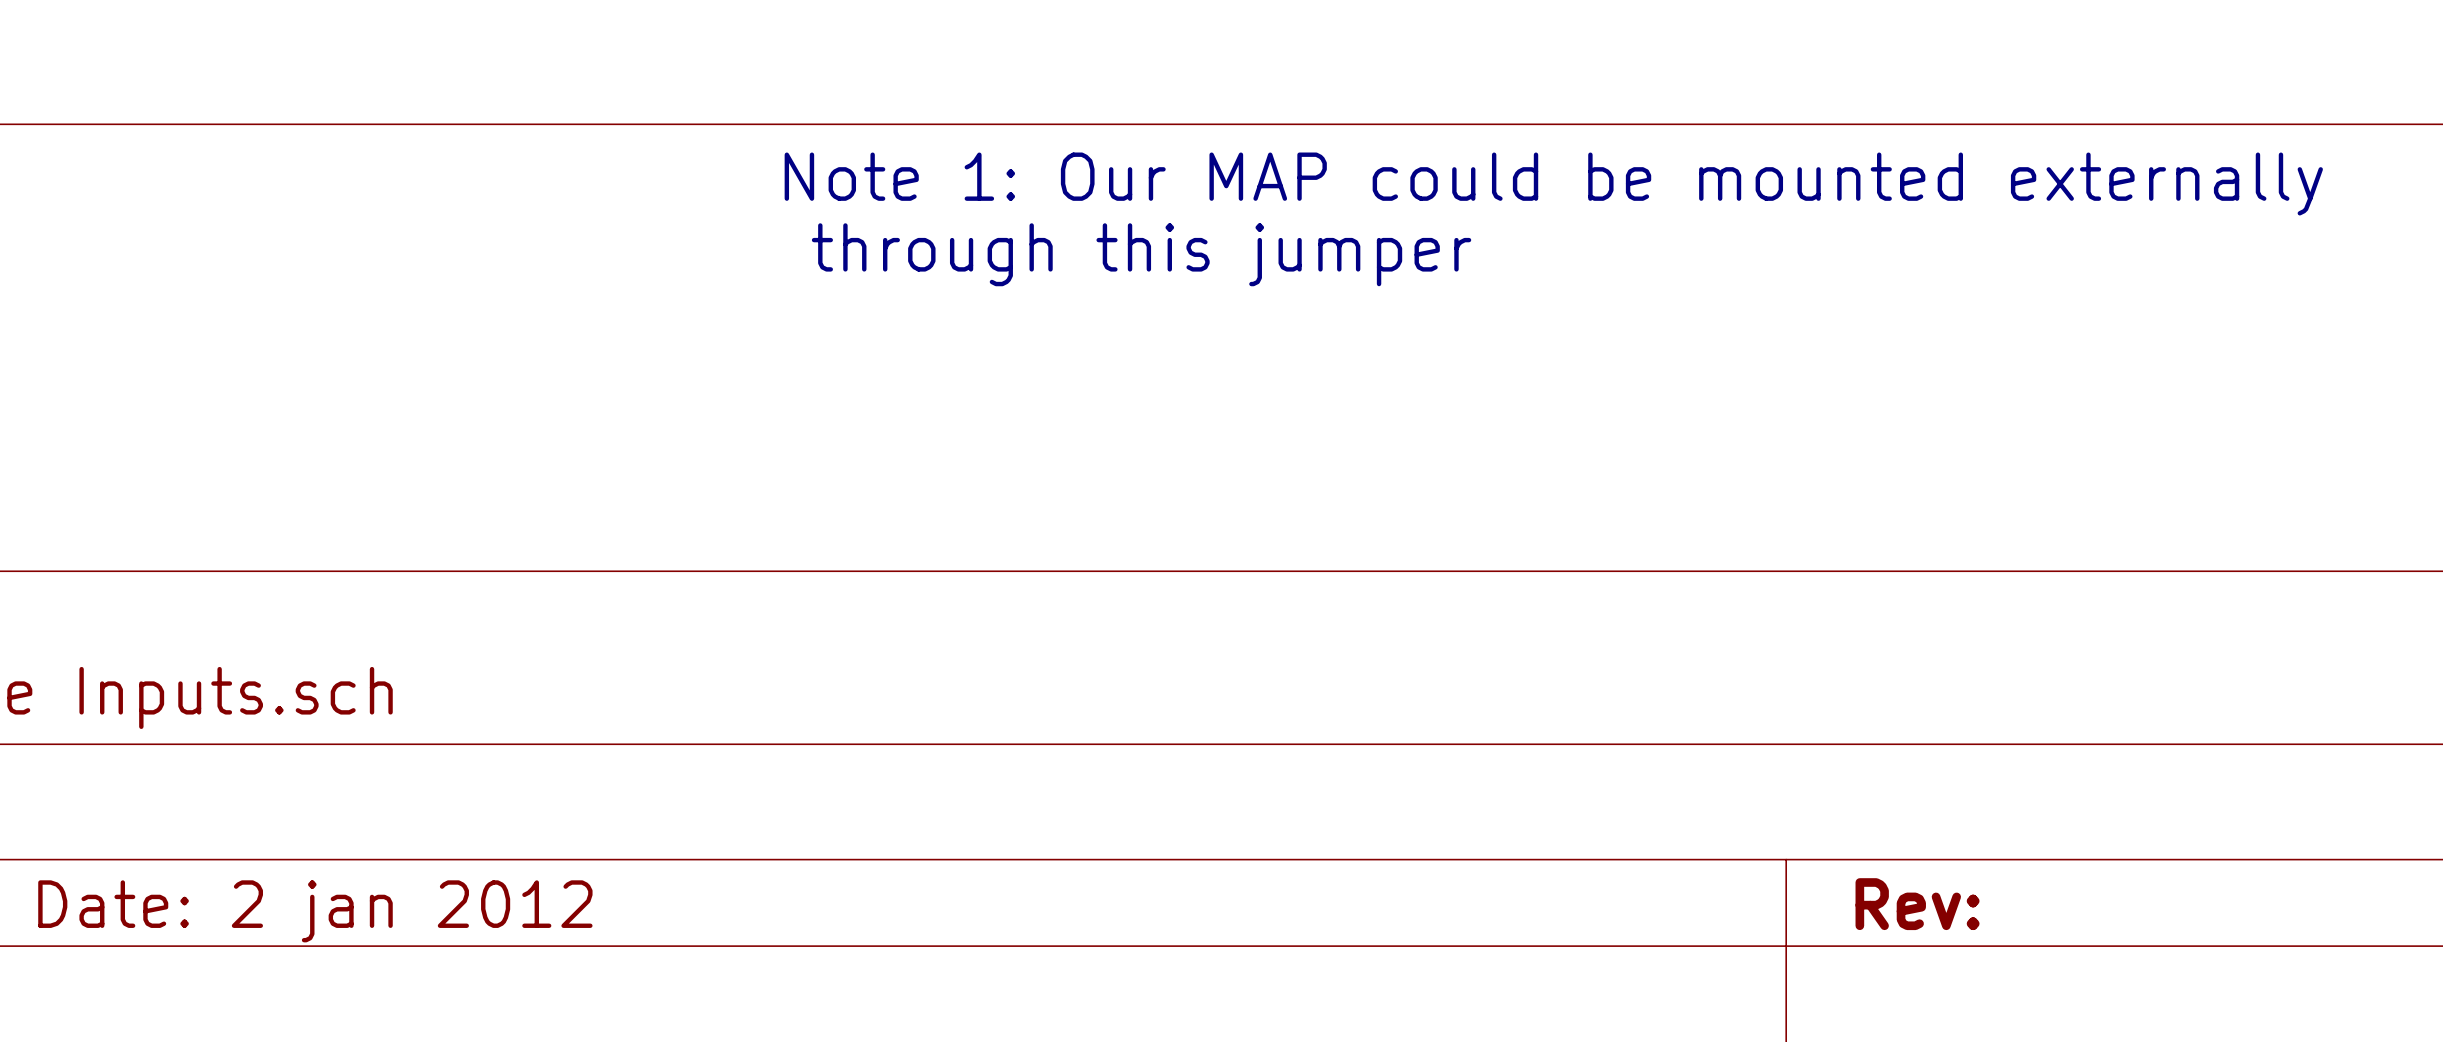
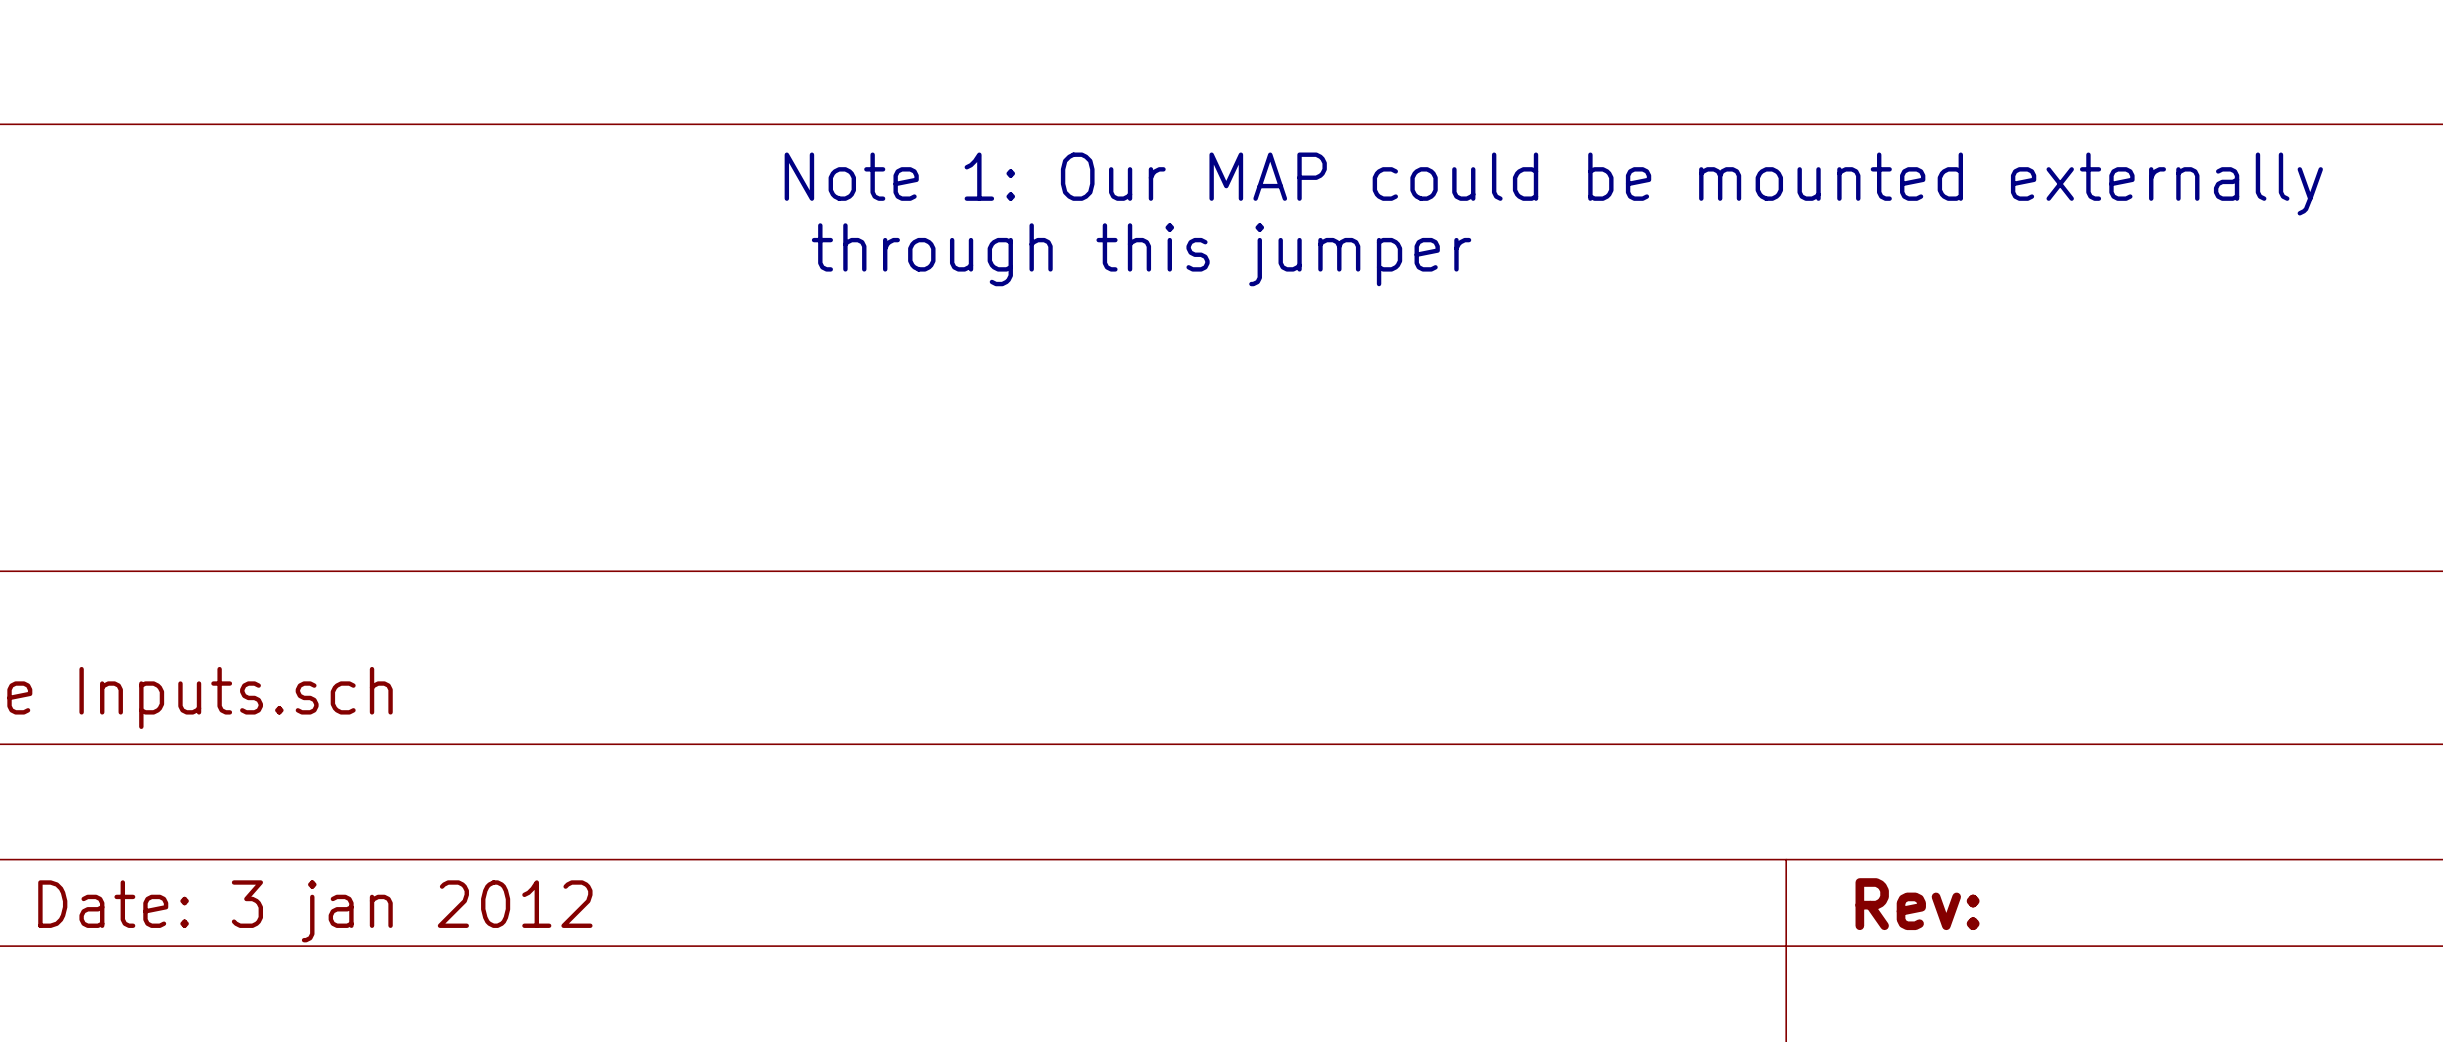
title block: Date: 2 jan 2012 (315, 911) -> Date: 3 jan 2012 (315, 911)

